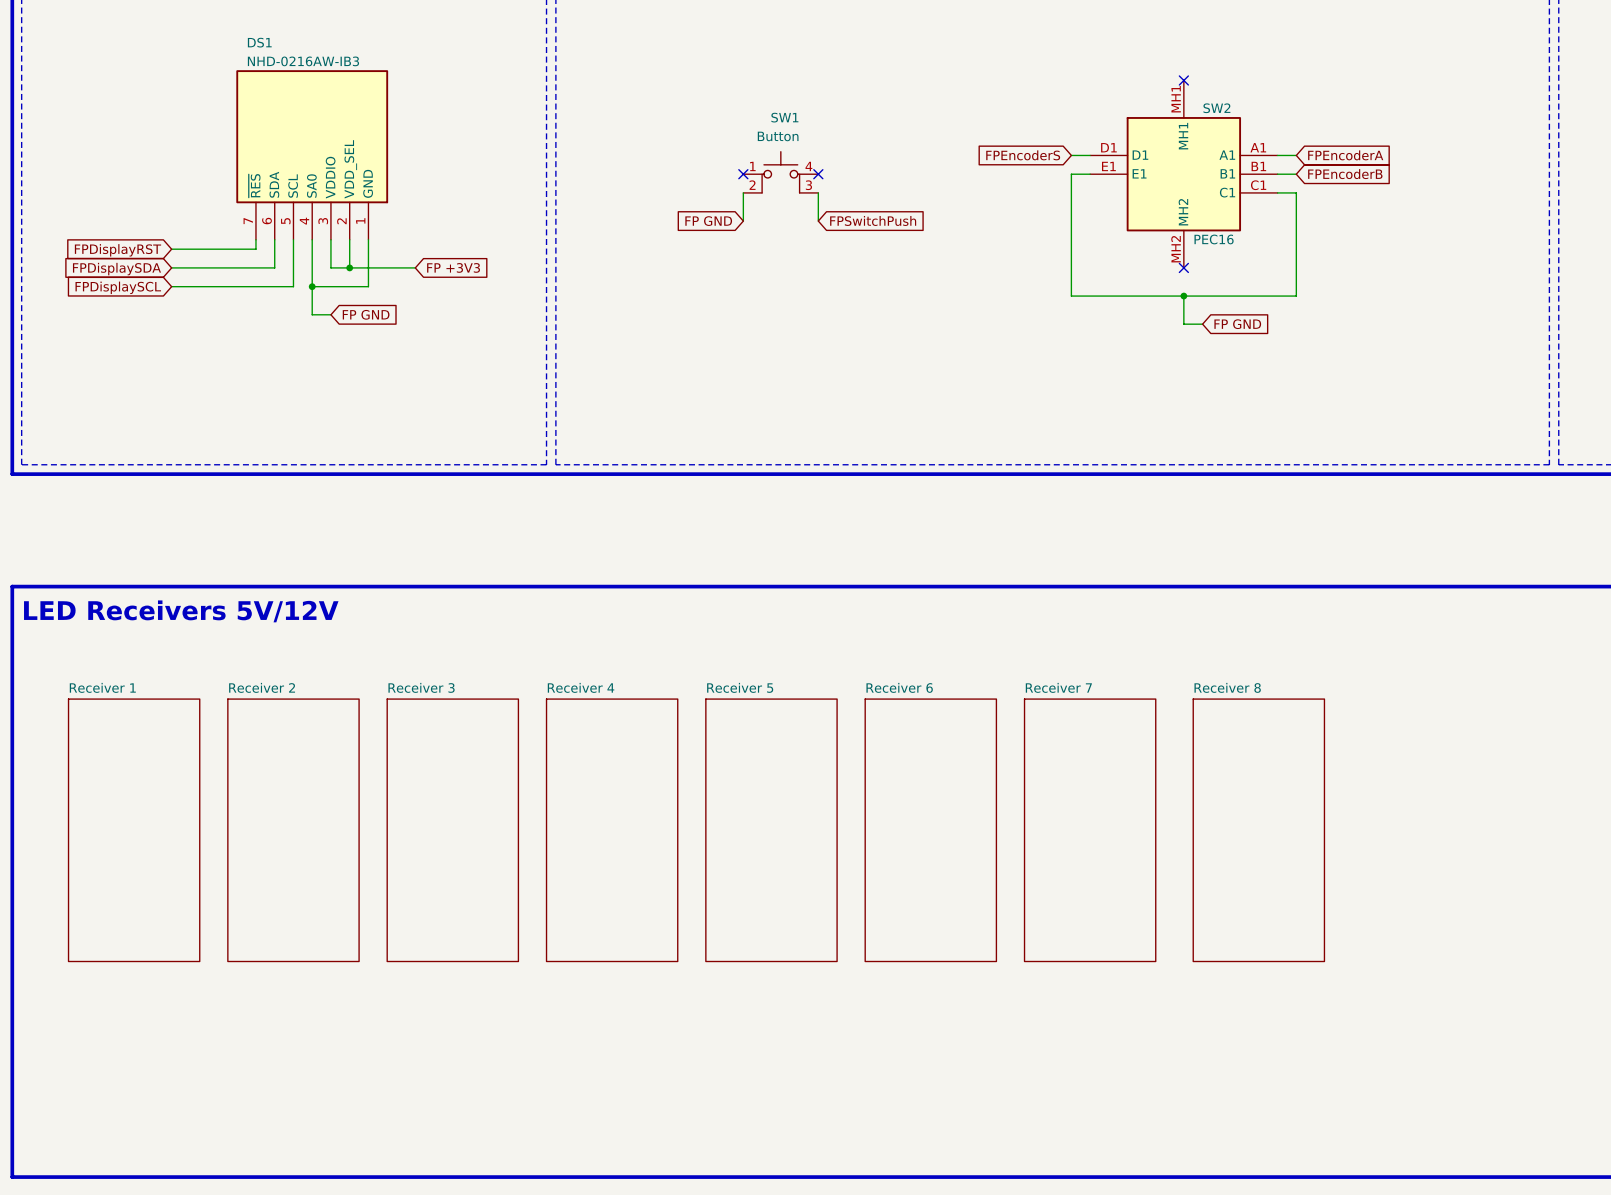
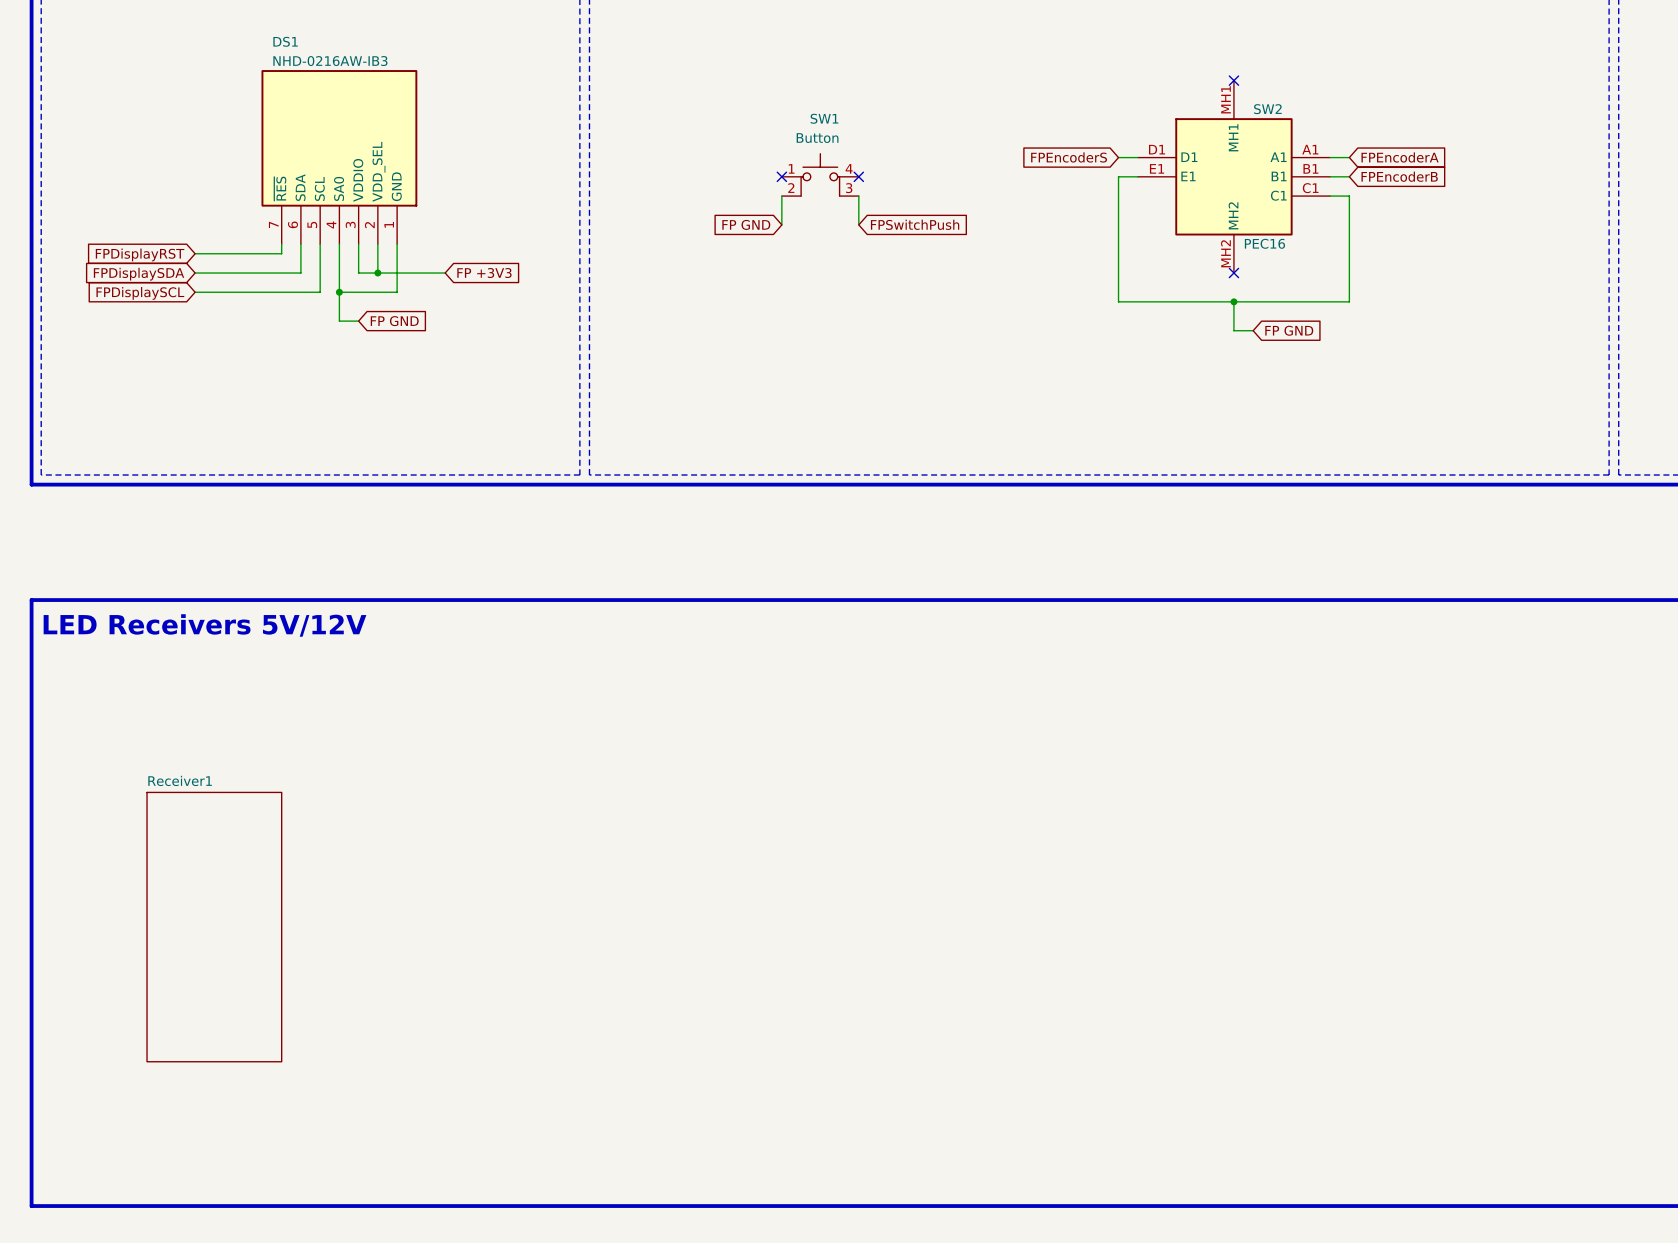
sheet Receiver 1: (134, 830) -> none
sheet Receiver 2: (293, 830) -> none
sheet Receiver 3: (452, 830) -> none
sheet Receiver 4: (612, 830) -> none
sheet Receiver 5: (771, 830) -> none
sheet Receiver 6: (930, 830) -> none
sheet Receiver 7: (1090, 830) -> none
sheet Receiver 8: (1258, 830) -> none
sheet Receiver1: none -> (214, 927)

